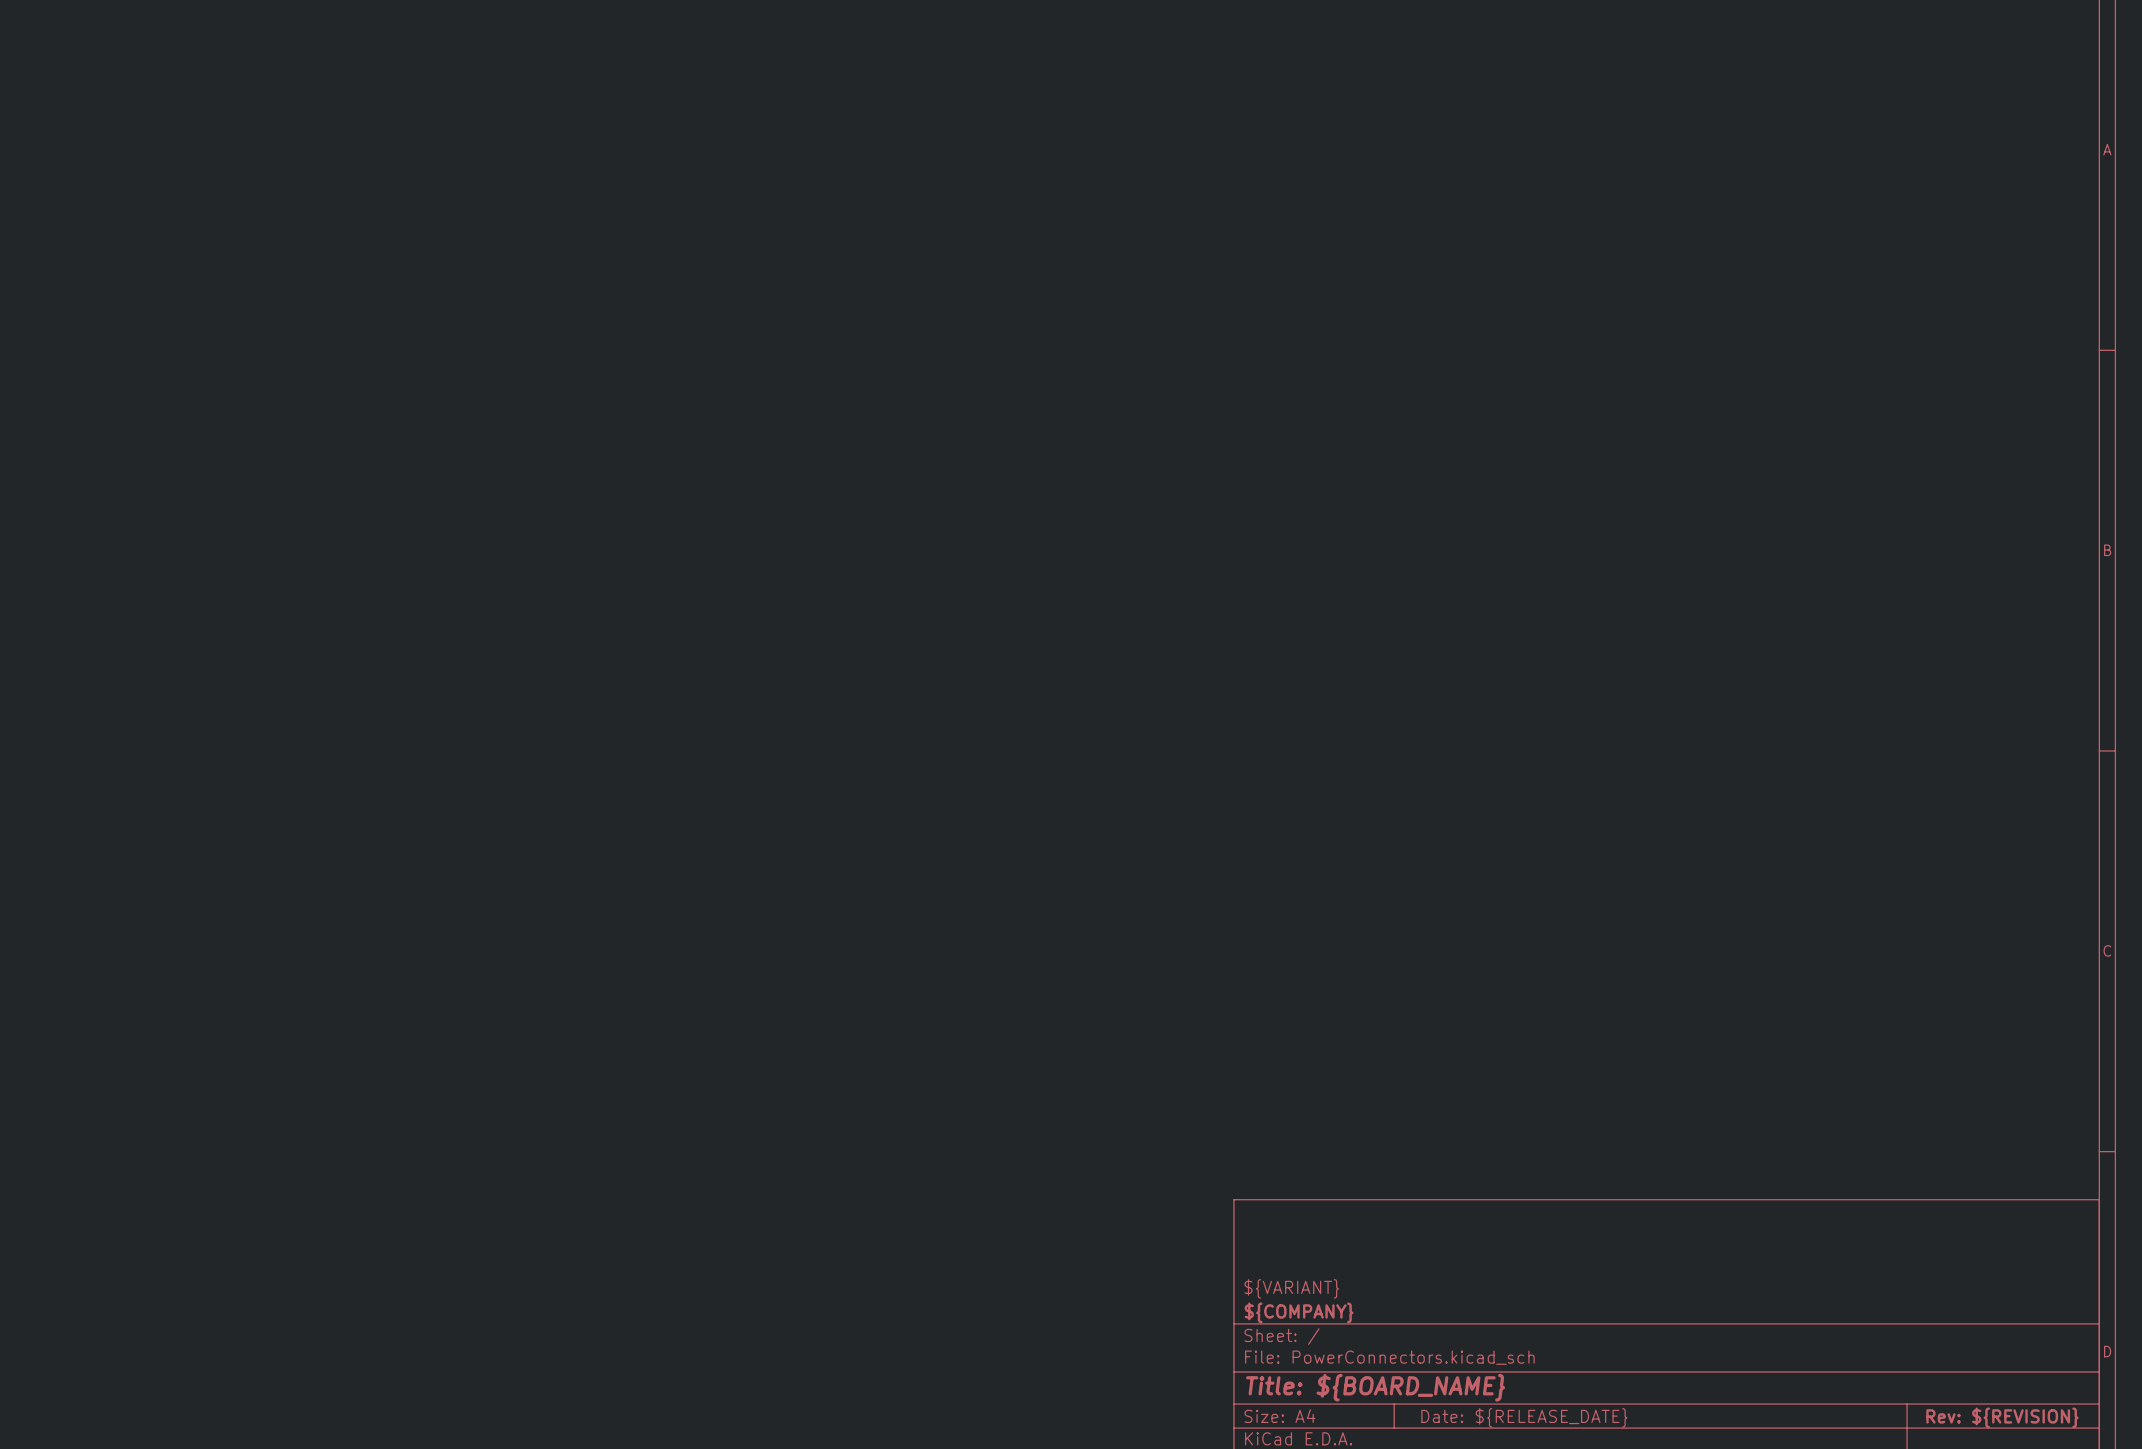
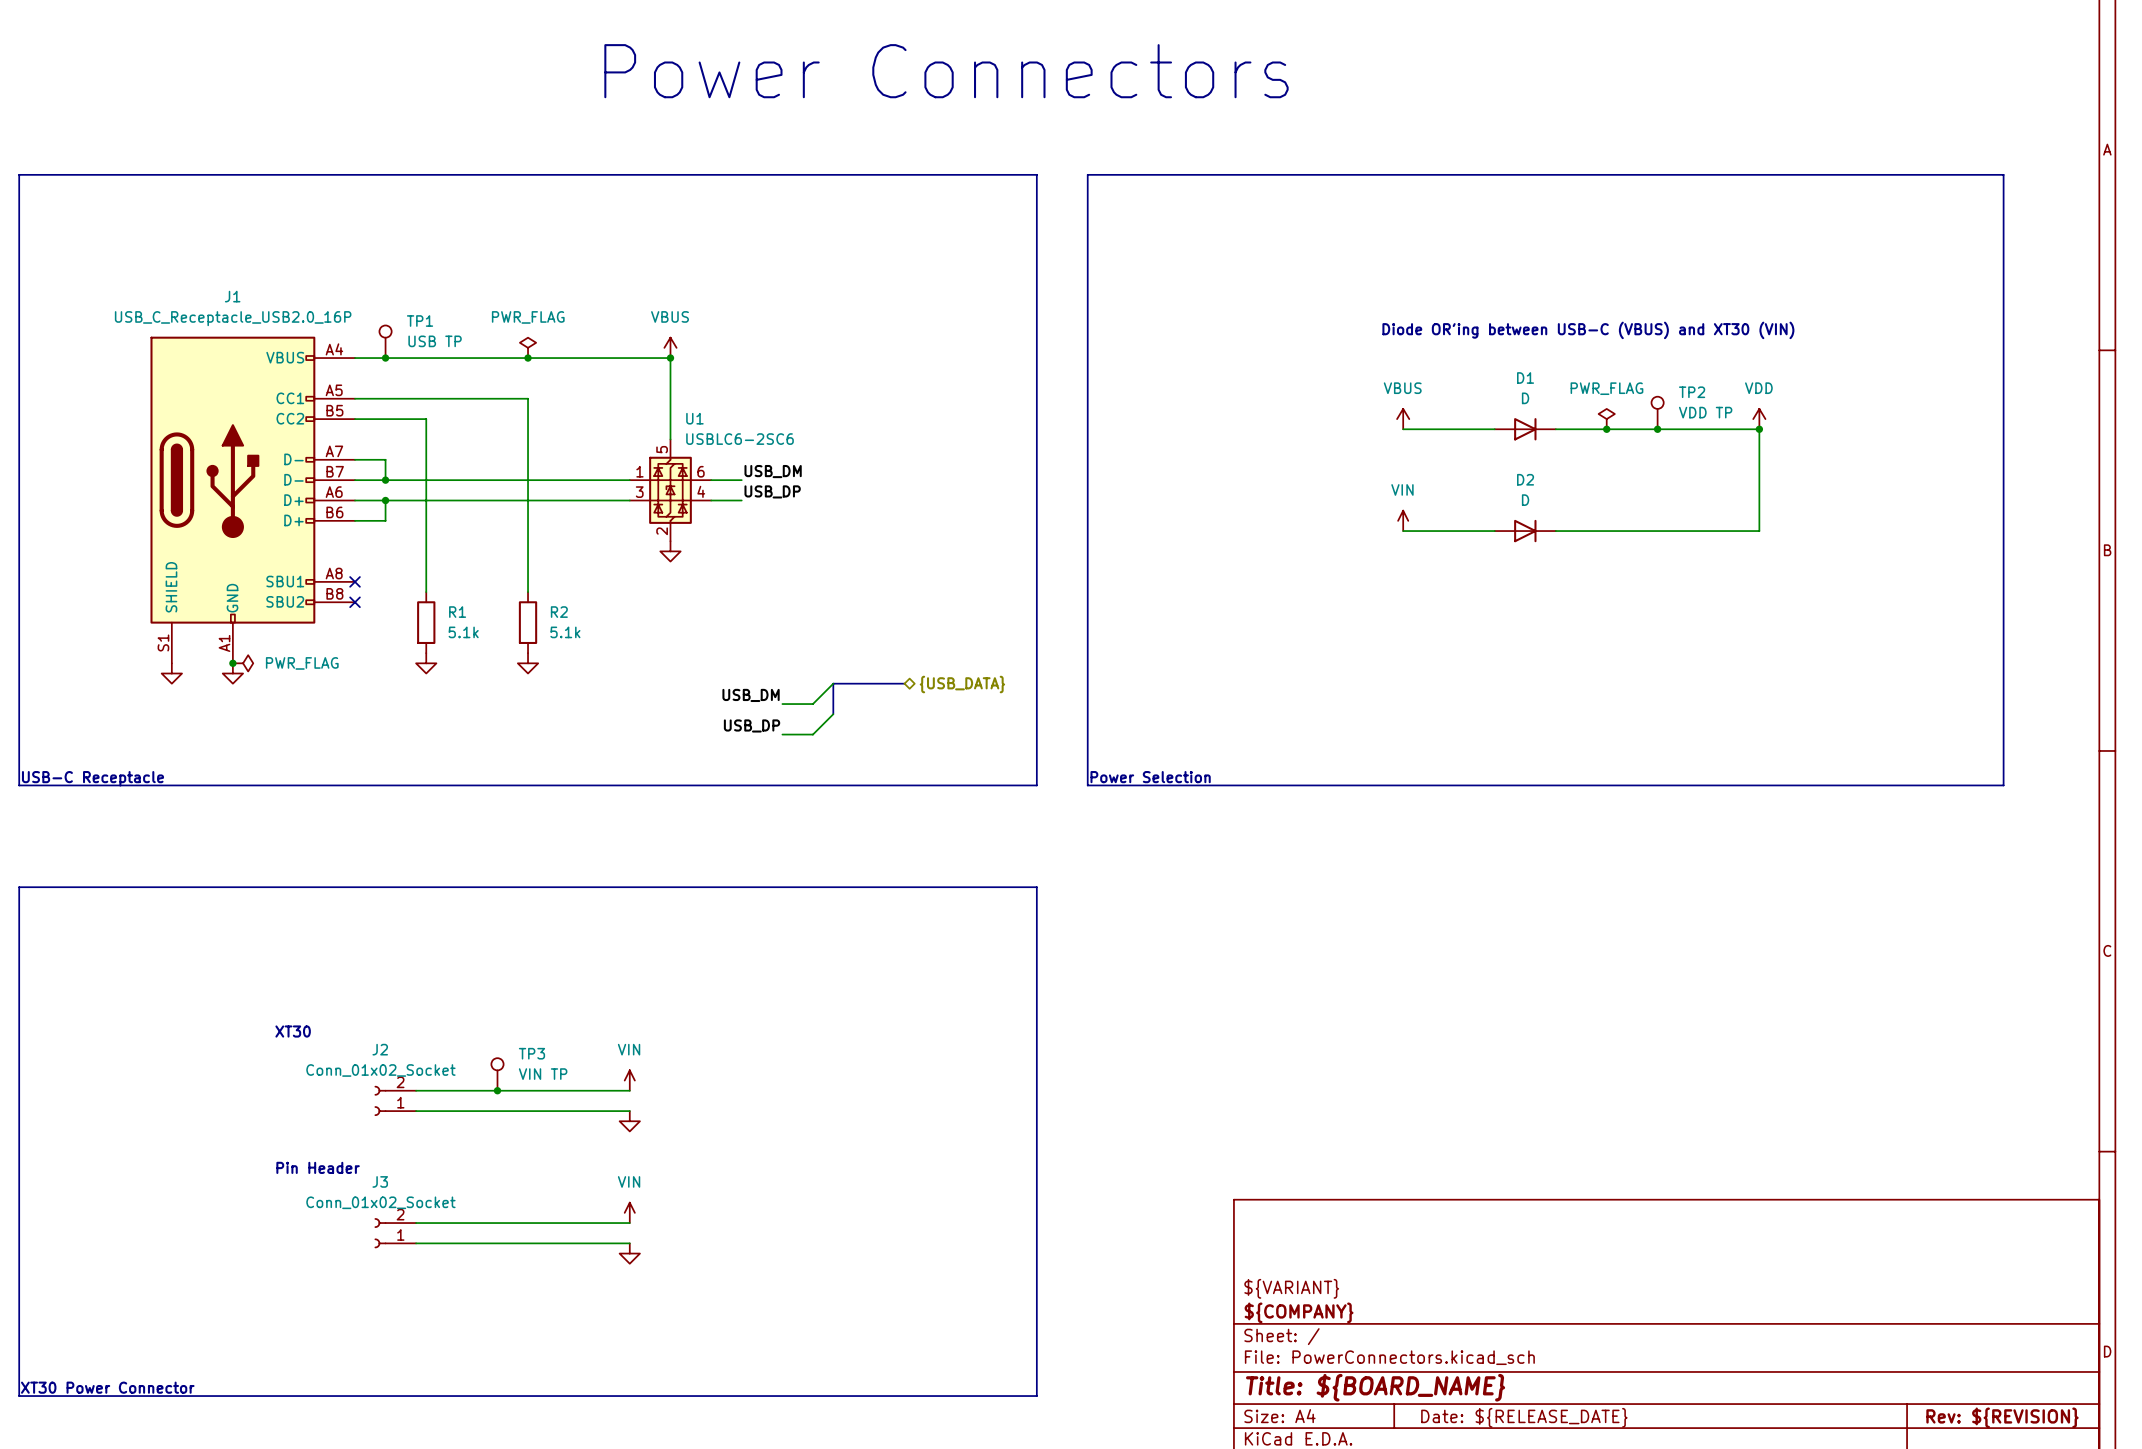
text: none -> Power Connectors (946, 71)
line: none -> (19, 174) (19, 785) (1036, 785) (1036, 174) (19, 174)
line: none -> (1087, 174) (2003, 174) (2003, 785) (1087, 785) (1087, 174)
text: none -> Diode OR'ing between USB-C (VBUS) and XT30 (VIN) (1588, 330)
TP1: none -> USB TP (385, 341)
power symbol: none -> PWR_FLAG (528, 347)
power symbol: none -> VBUS (670, 347)
wire: none -> (355, 358) (670, 358) (670, 439)
junction: none -> (385, 358)
junction: none -> (528, 358)
junction: none -> (670, 358)
wire: none -> (355, 398) (528, 398) (528, 592)
TP2: none -> VDD TP (1657, 412)
wire: none -> (355, 419) (426, 419) (426, 592)
power symbol: none -> VBUS (1403, 419)
power symbol: none -> PWR_FLAG (1606, 419)
power symbol: none -> VDD (1759, 419)
wire: none -> (1403, 429) (1494, 429)
D1: none -> D (1525, 429)
wire: none -> (1555, 429) (1759, 429) (1759, 531) (1555, 531)
junction: none -> (1606, 429)
junction: none -> (1657, 429)
junction: none -> (1759, 429)
wire: none -> (355, 459) (385, 459) (385, 480)
label: none -> USB_DM (773, 471)
wire: none -> (355, 480) (629, 480)
junction: none -> (385, 480)
wire: none -> (711, 480) (741, 480)
U1: none -> USBLC6-2SC6 (670, 490)
label: none -> USB_DP (772, 491)
J1: none -> USB_C_Receptacle_USB2.0_16P (252, 499)
wire: none -> (355, 500) (629, 500)
wire: none -> (385, 500) (385, 520) (355, 520)
junction: none -> (385, 500)
wire: none -> (711, 500) (741, 500)
power symbol: none -> VIN (1403, 520)
wire: none -> (1403, 531) (1494, 531)
D2: none -> D (1525, 531)
power symbol: none -> (670, 551)
no-connect mark: none -> (355, 581)
no-connect mark: none -> (355, 602)
R1: none -> 5.1k (426, 622)
R2: none -> 5.1k (528, 622)
junction: none -> (232, 663)
power symbol: none -> PWR_FLAG (243, 663)
power symbol: none -> (426, 663)
power symbol: none -> (528, 663)
power symbol: none -> (171, 673)
power symbol: none -> (232, 673)
wire: none -> (833, 683) (812, 704) (782, 704)
bus: none -> (904, 683) (833, 683) (833, 714)
hierarchical label: none -> {USB_DATA} (962, 684)
label: none -> USB_DM (751, 695)
wire: none -> (833, 714) (812, 734) (782, 734)
label: none -> USB_DP (752, 725)
text: none -> Power Selection (1150, 777)
text: none -> USB-C Receptacle (92, 778)
line: none -> (19, 887) (1036, 887) (1036, 1396) (19, 1396) (19, 887)
text: none -> XT30 (293, 1031)
TP3: none -> VIN TP (497, 1074)
power symbol: none -> VIN (629, 1080)
wire: none -> (416, 1090) (629, 1090)
junction: none -> (497, 1090)
J2: none -> Conn_01x02_Socket (395, 1100)
wire: none -> (416, 1111) (629, 1111)
power symbol: none -> (629, 1121)
text: none -> Pin Header (318, 1167)
power symbol: none -> VIN (629, 1212)
wire: none -> (416, 1223) (629, 1223)
J3: none -> Conn_01x02_Socket (395, 1233)
wire: none -> (416, 1243) (629, 1243)
power symbol: none -> (629, 1253)
text: none -> XT30 Power Connector (107, 1387)

